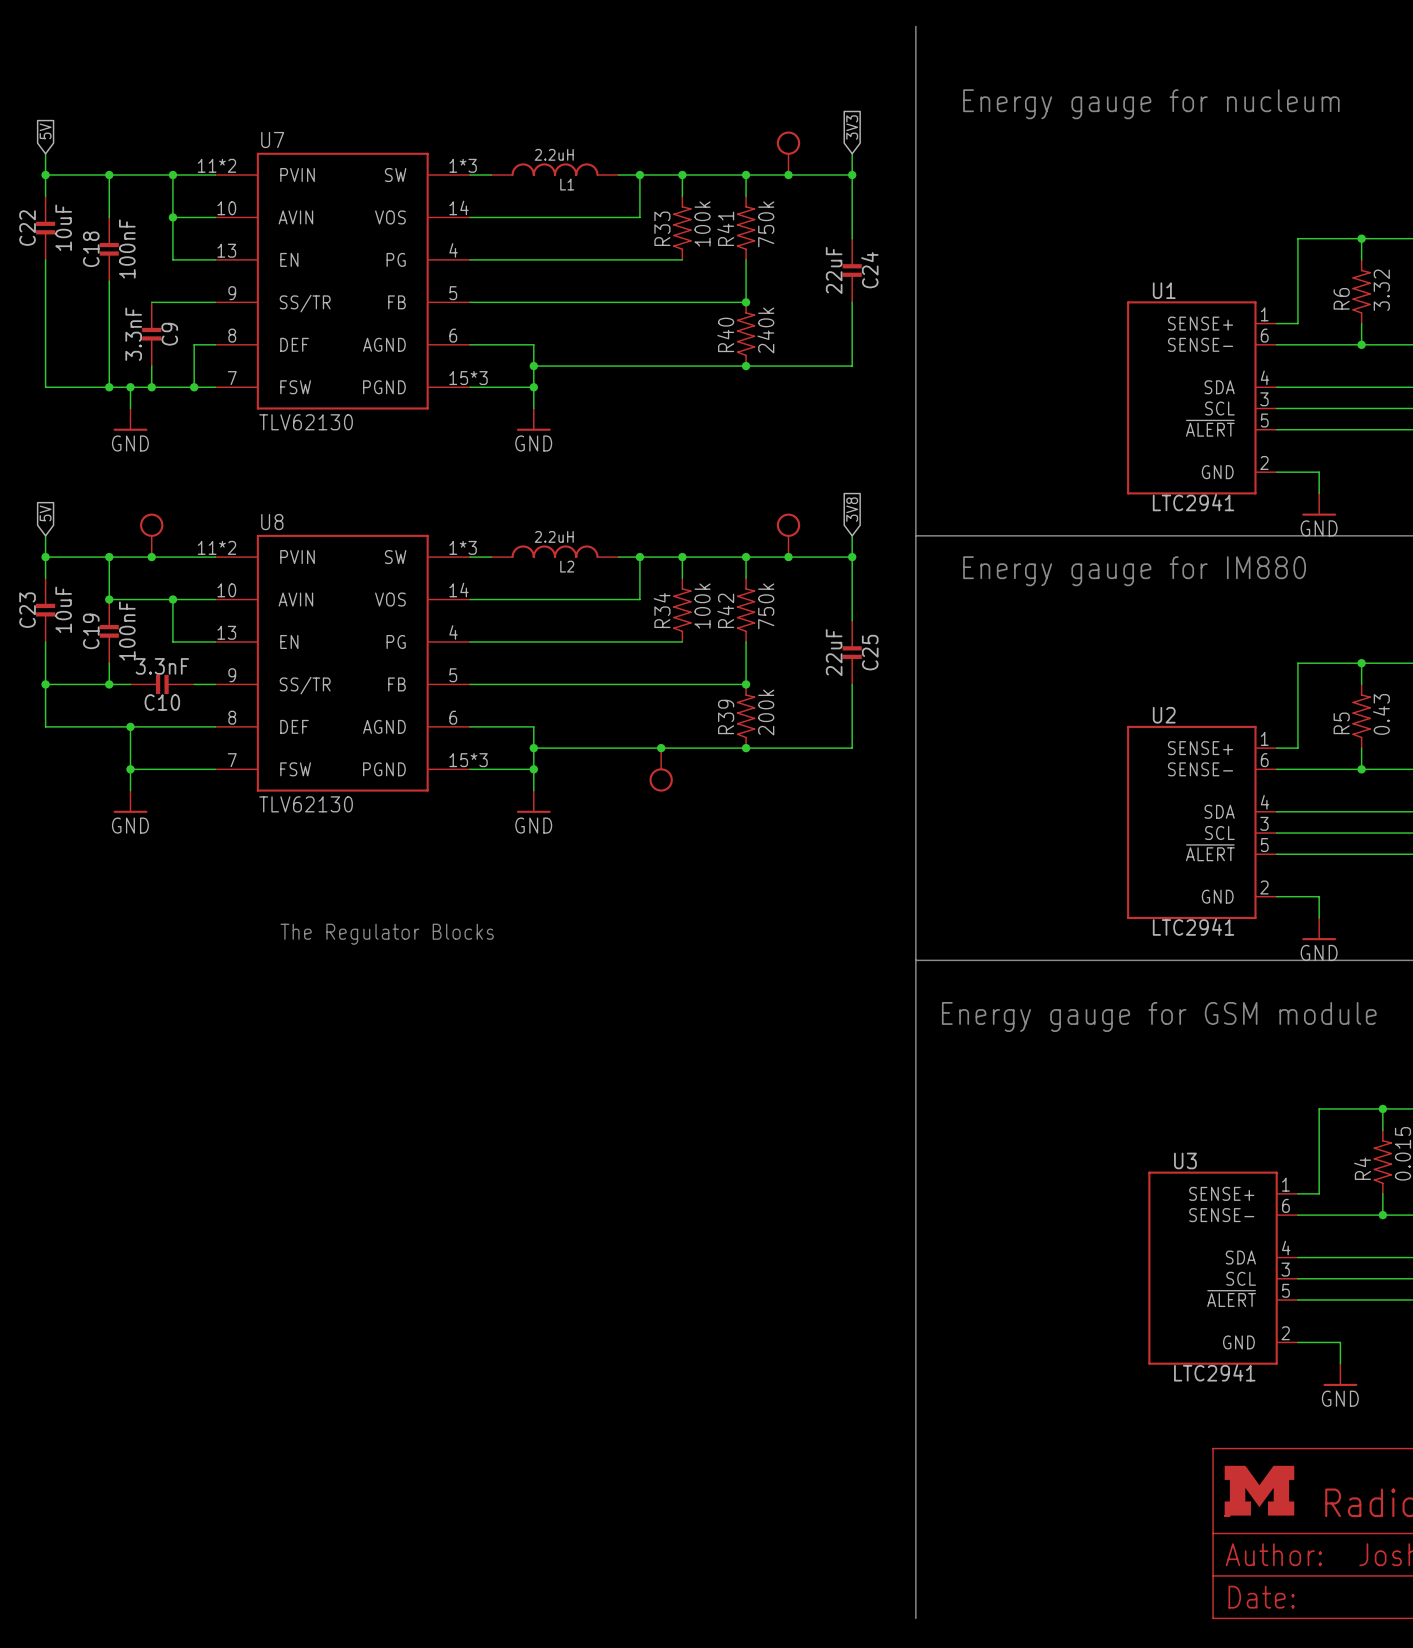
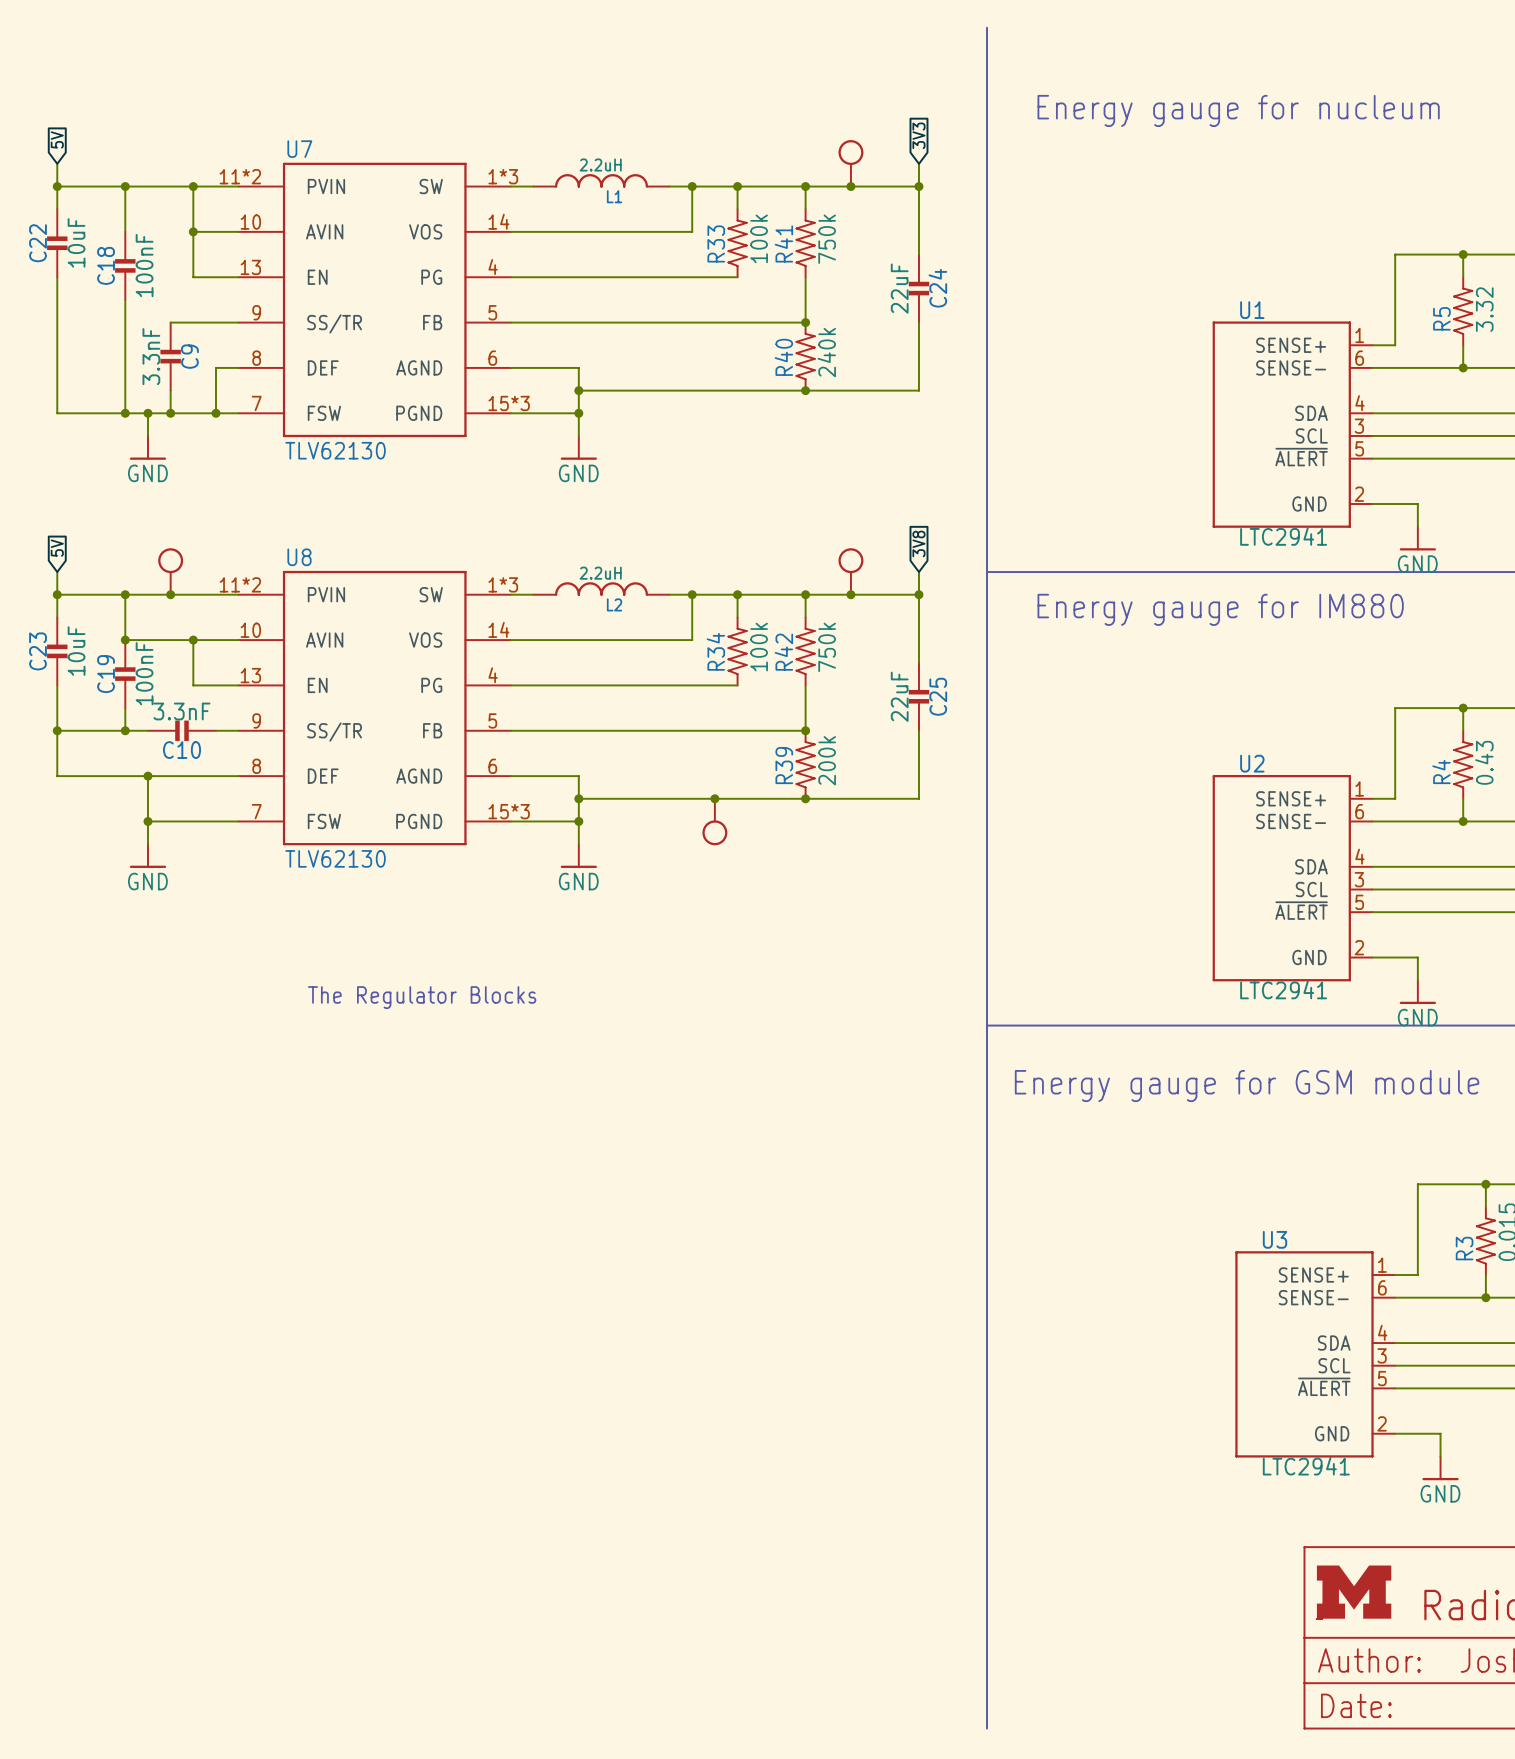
R6 name: R6 (1341, 298) -> R5 (1441, 318)
R5 name: R5 (1341, 723) -> R4 (1441, 772)
R4 name: R4 (1362, 1168) -> R3 (1464, 1248)

